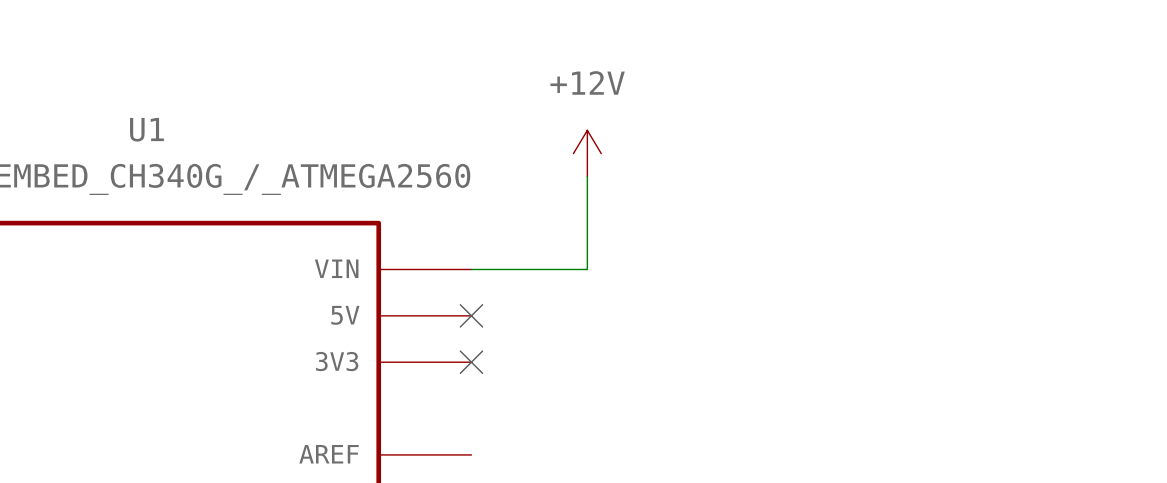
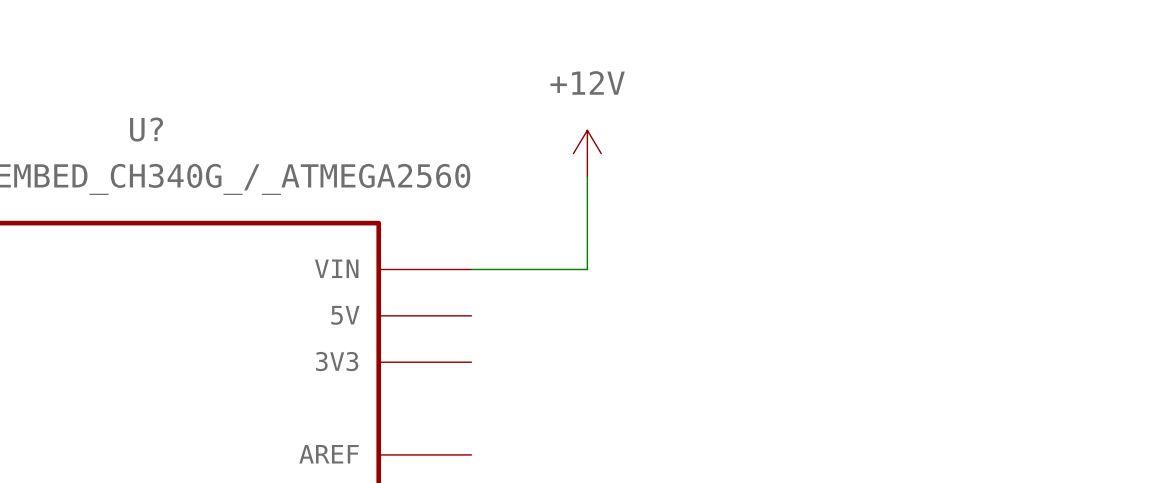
U1 name: U1 (146, 129) -> U? (146, 129)
no-connect mark: (471, 315) -> none
no-connect mark: (471, 362) -> none

